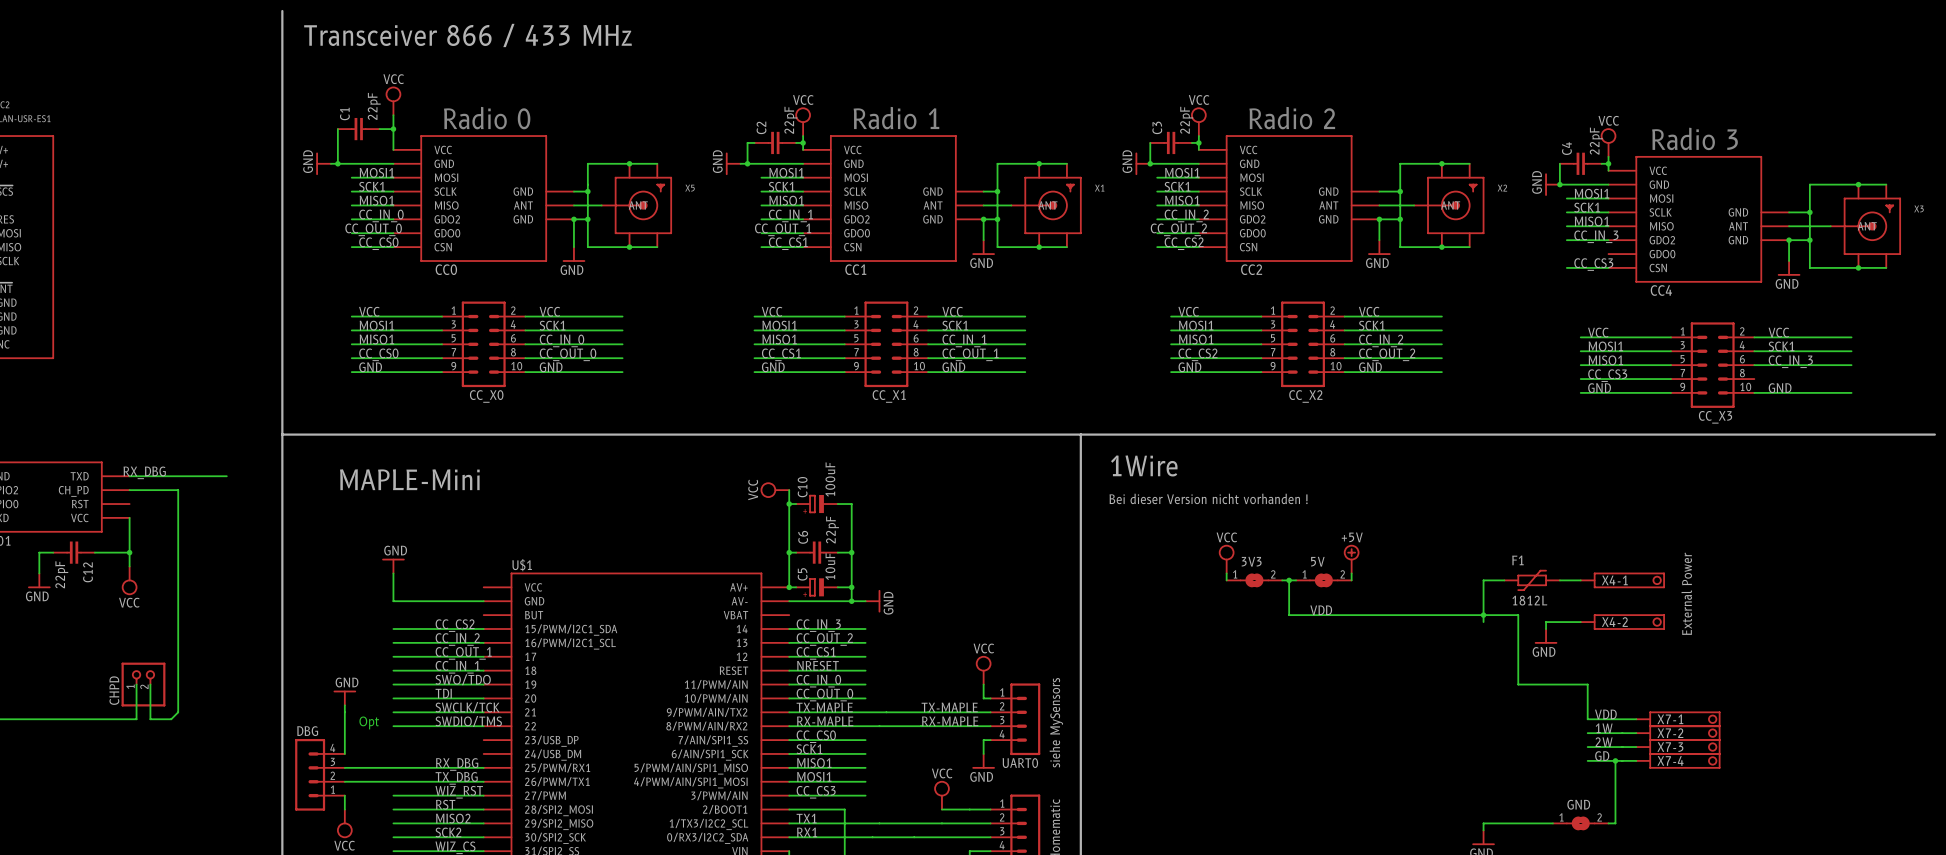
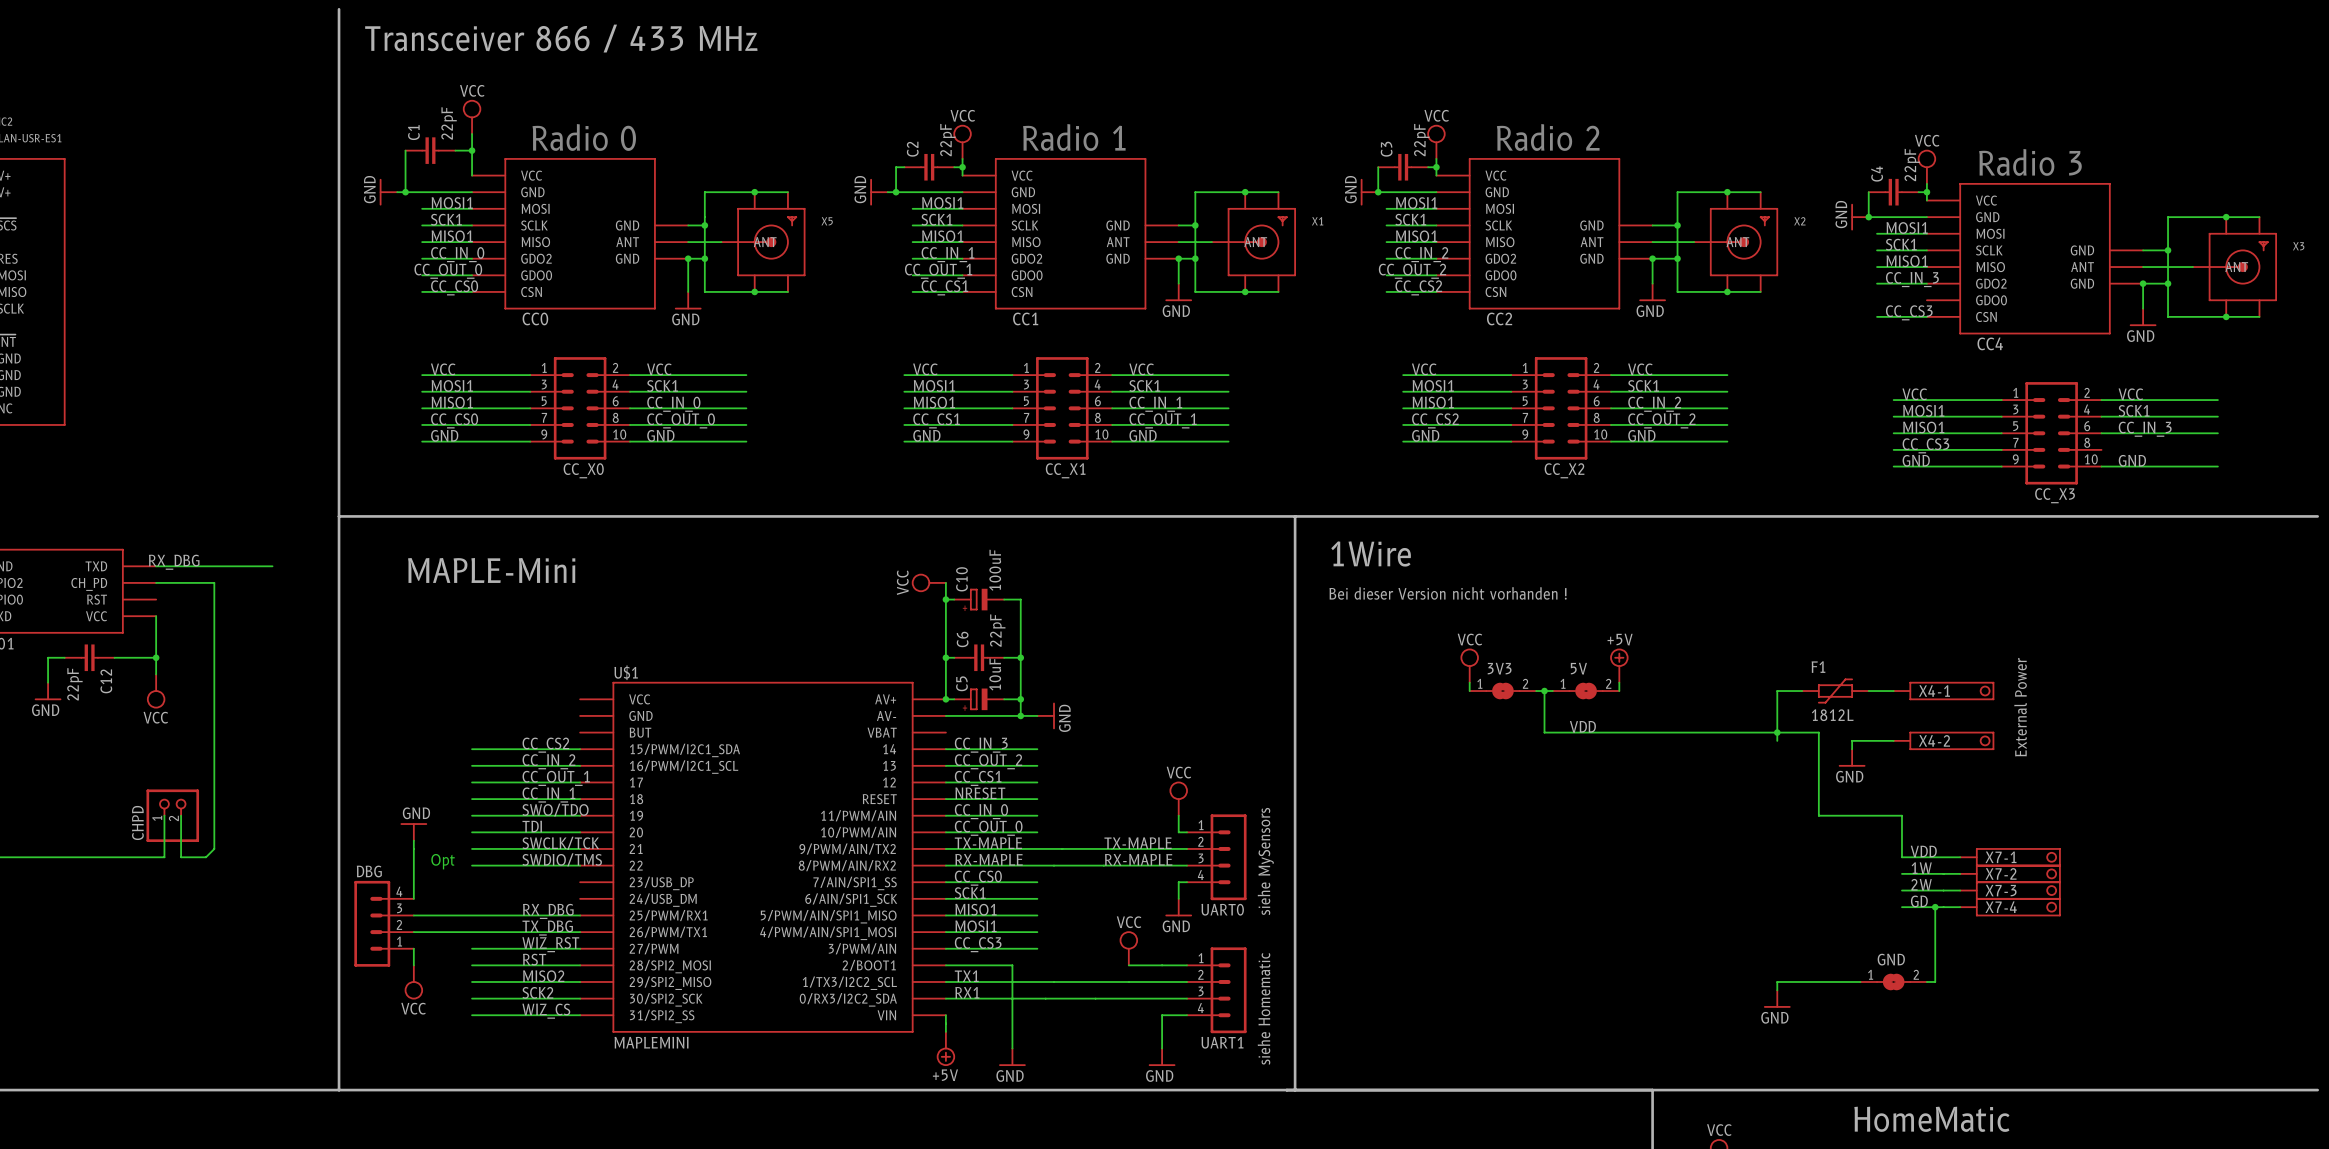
power symbol: GND (393, 566) -> none
wire: (393, 573) (393, 601) (483, 601) -> none

